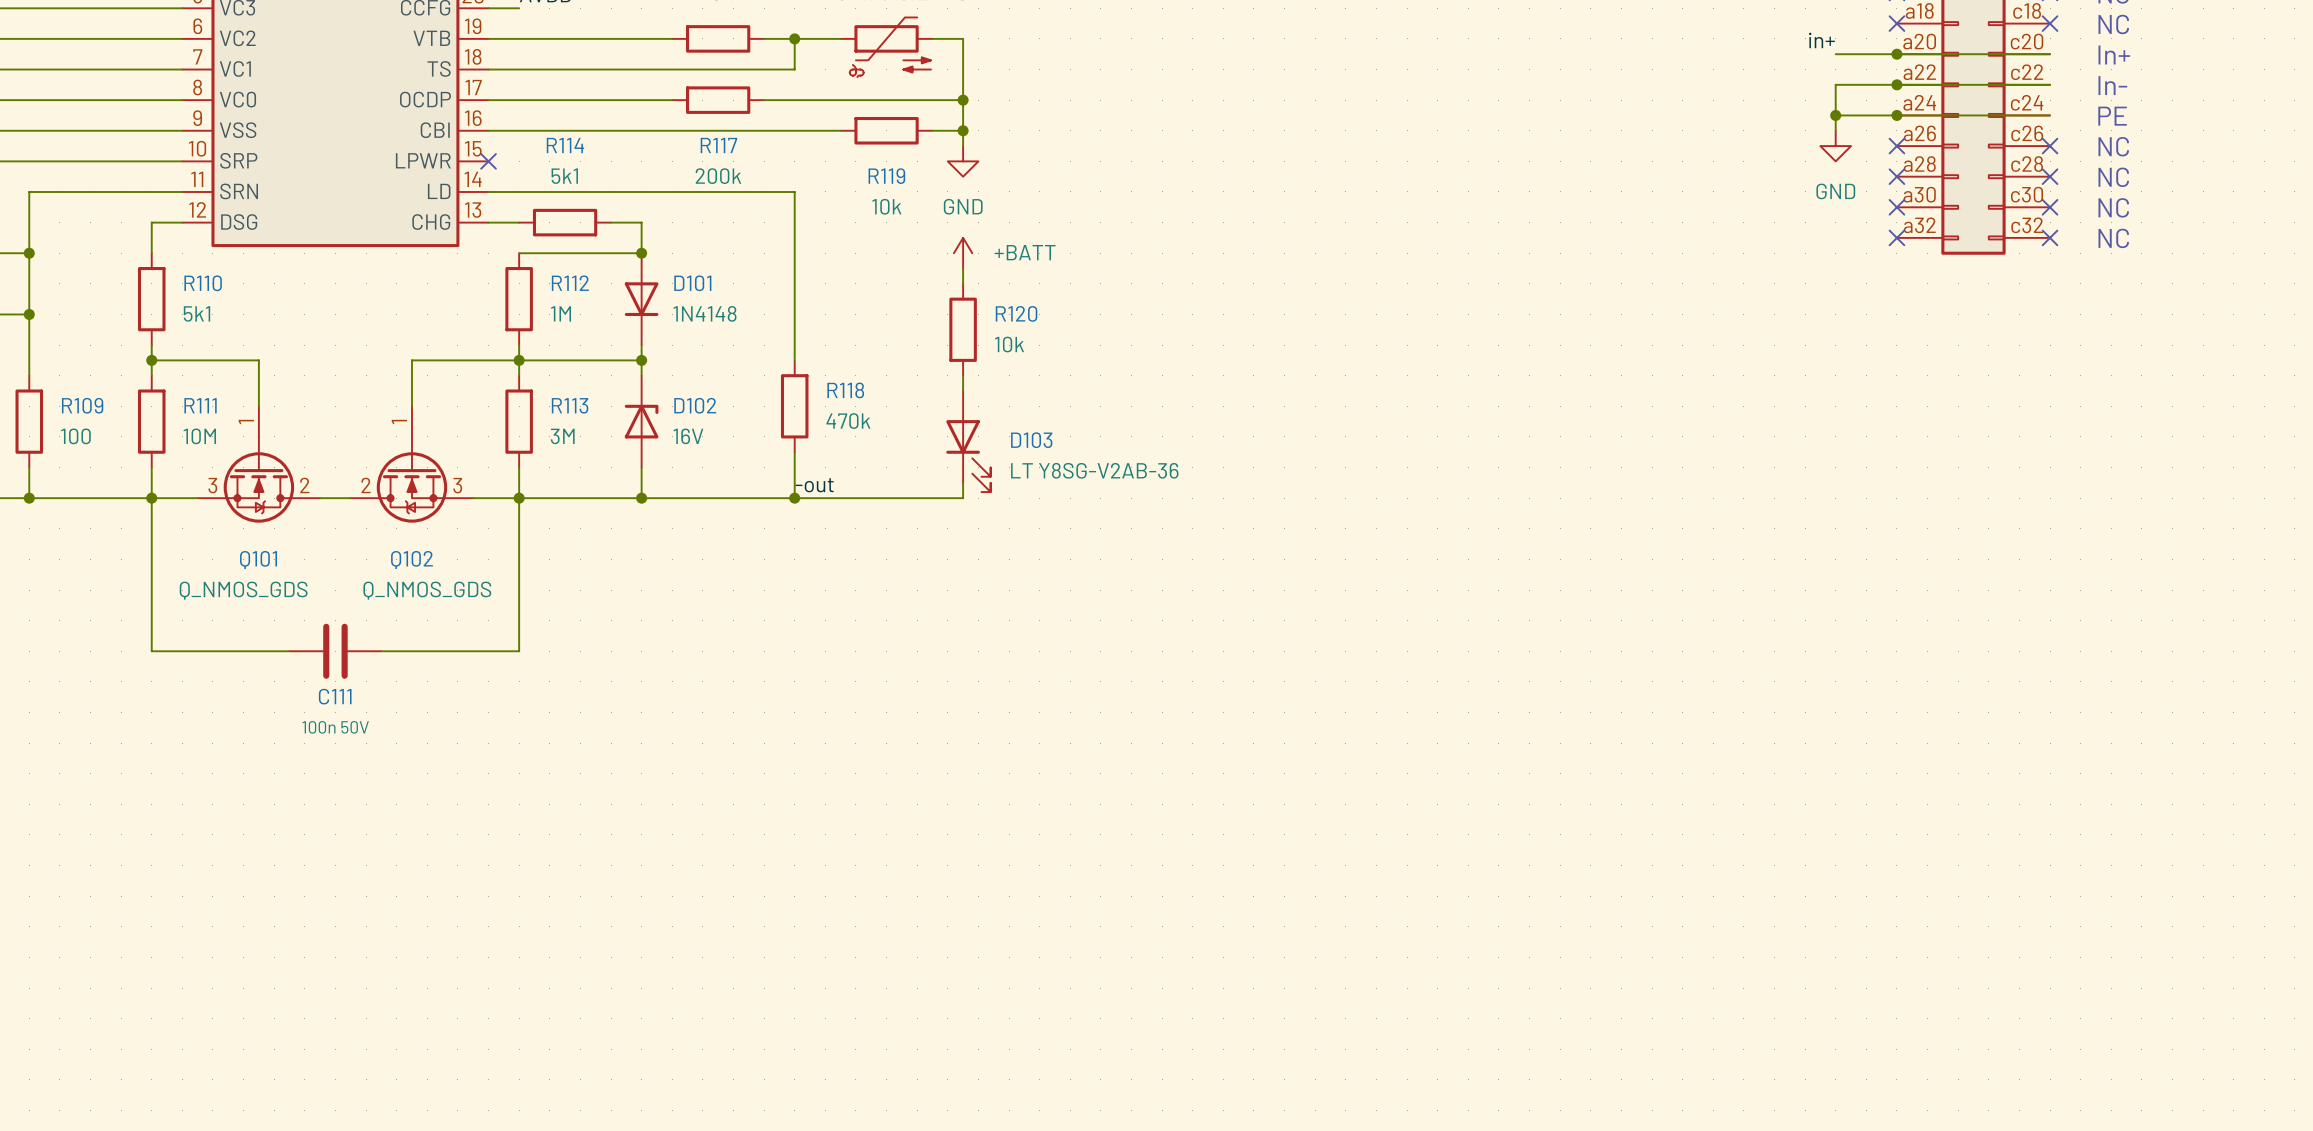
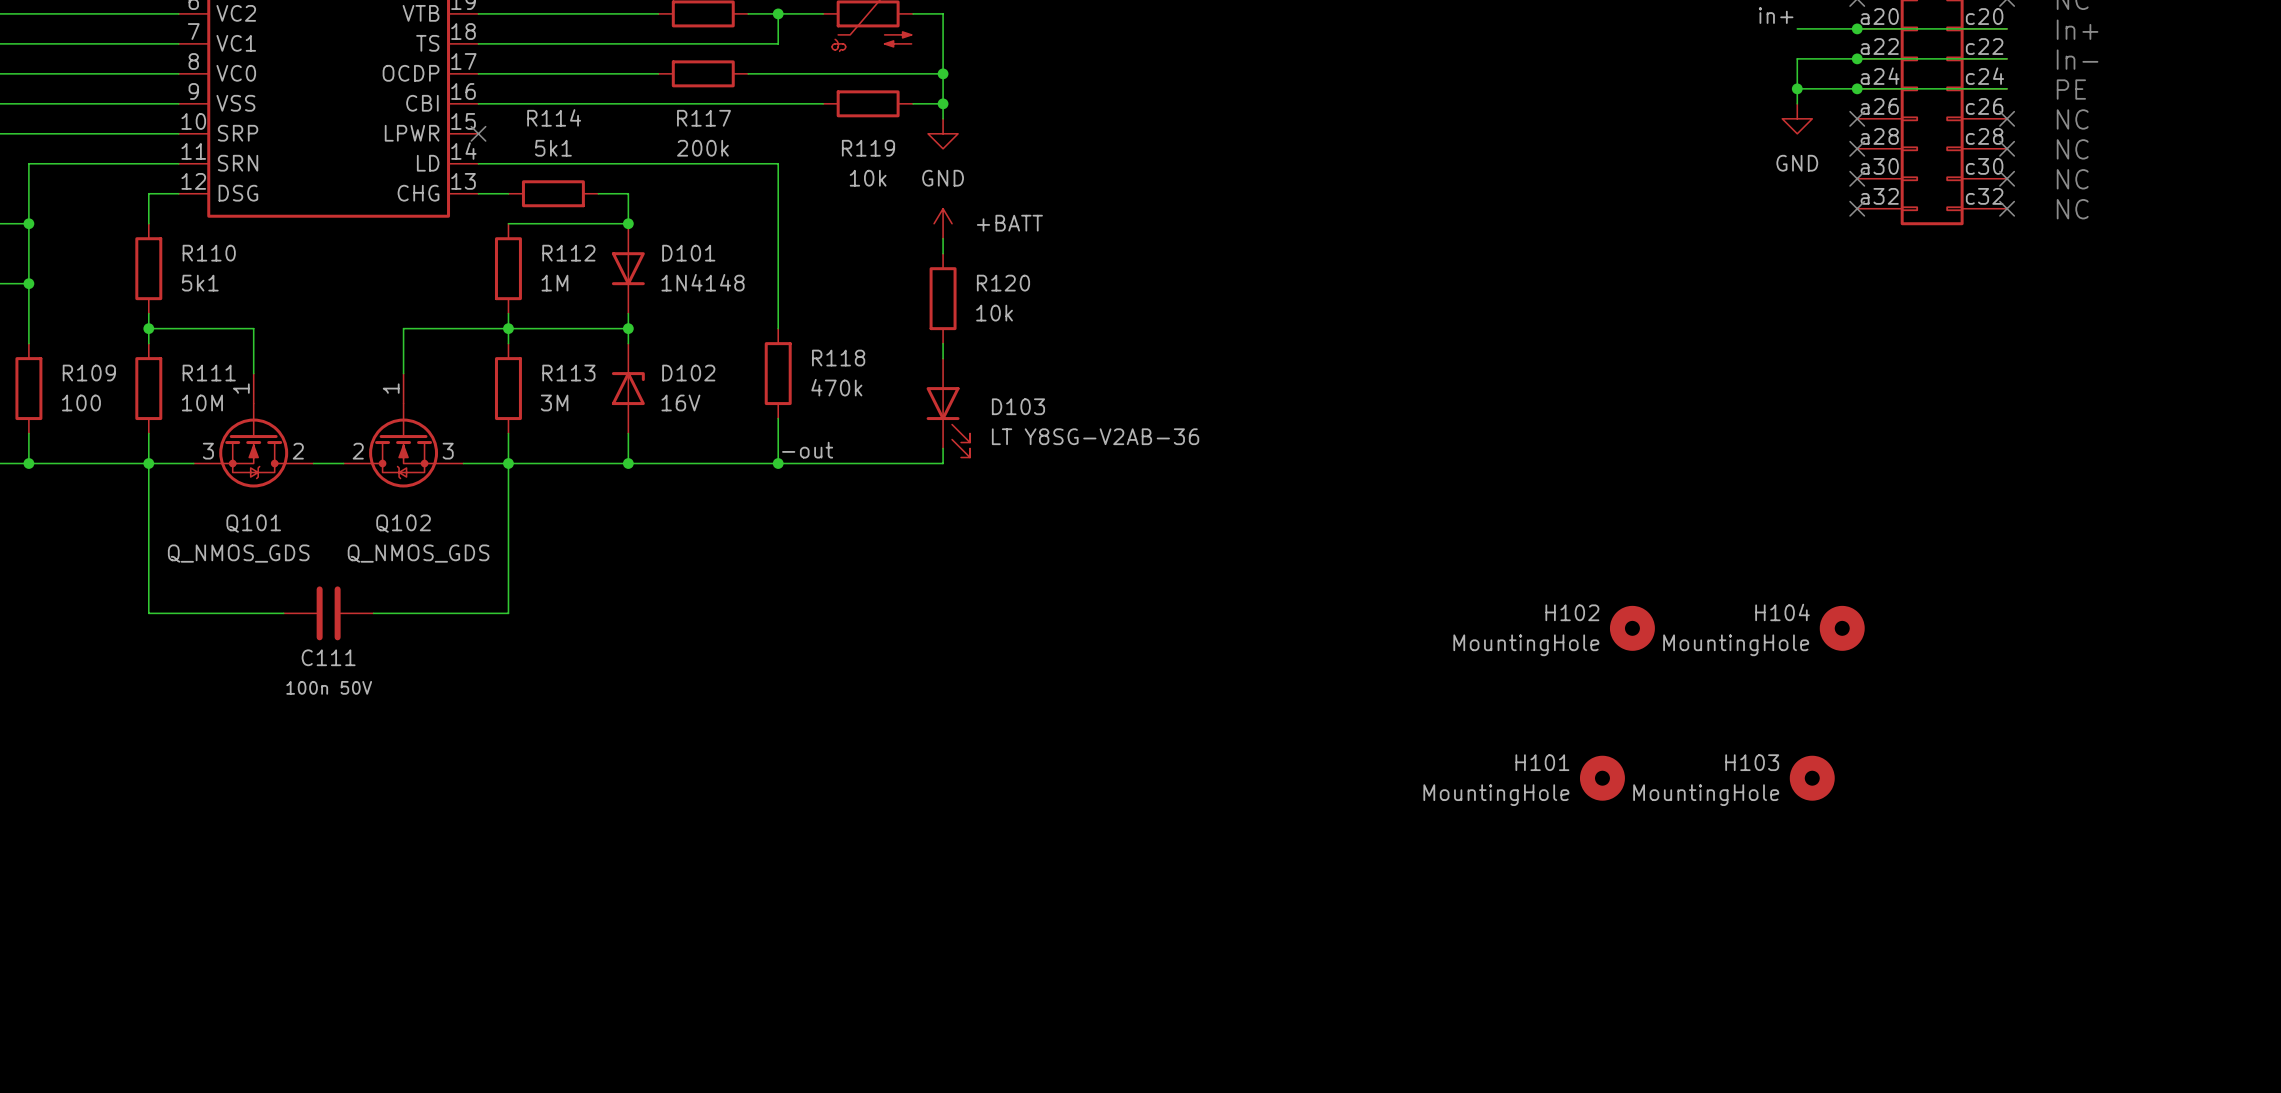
H102: none -> MountingHole (1632, 628)
H104: none -> MountingHole (1842, 628)
H101: none -> MountingHole (1602, 778)
H103: none -> MountingHole (1812, 778)

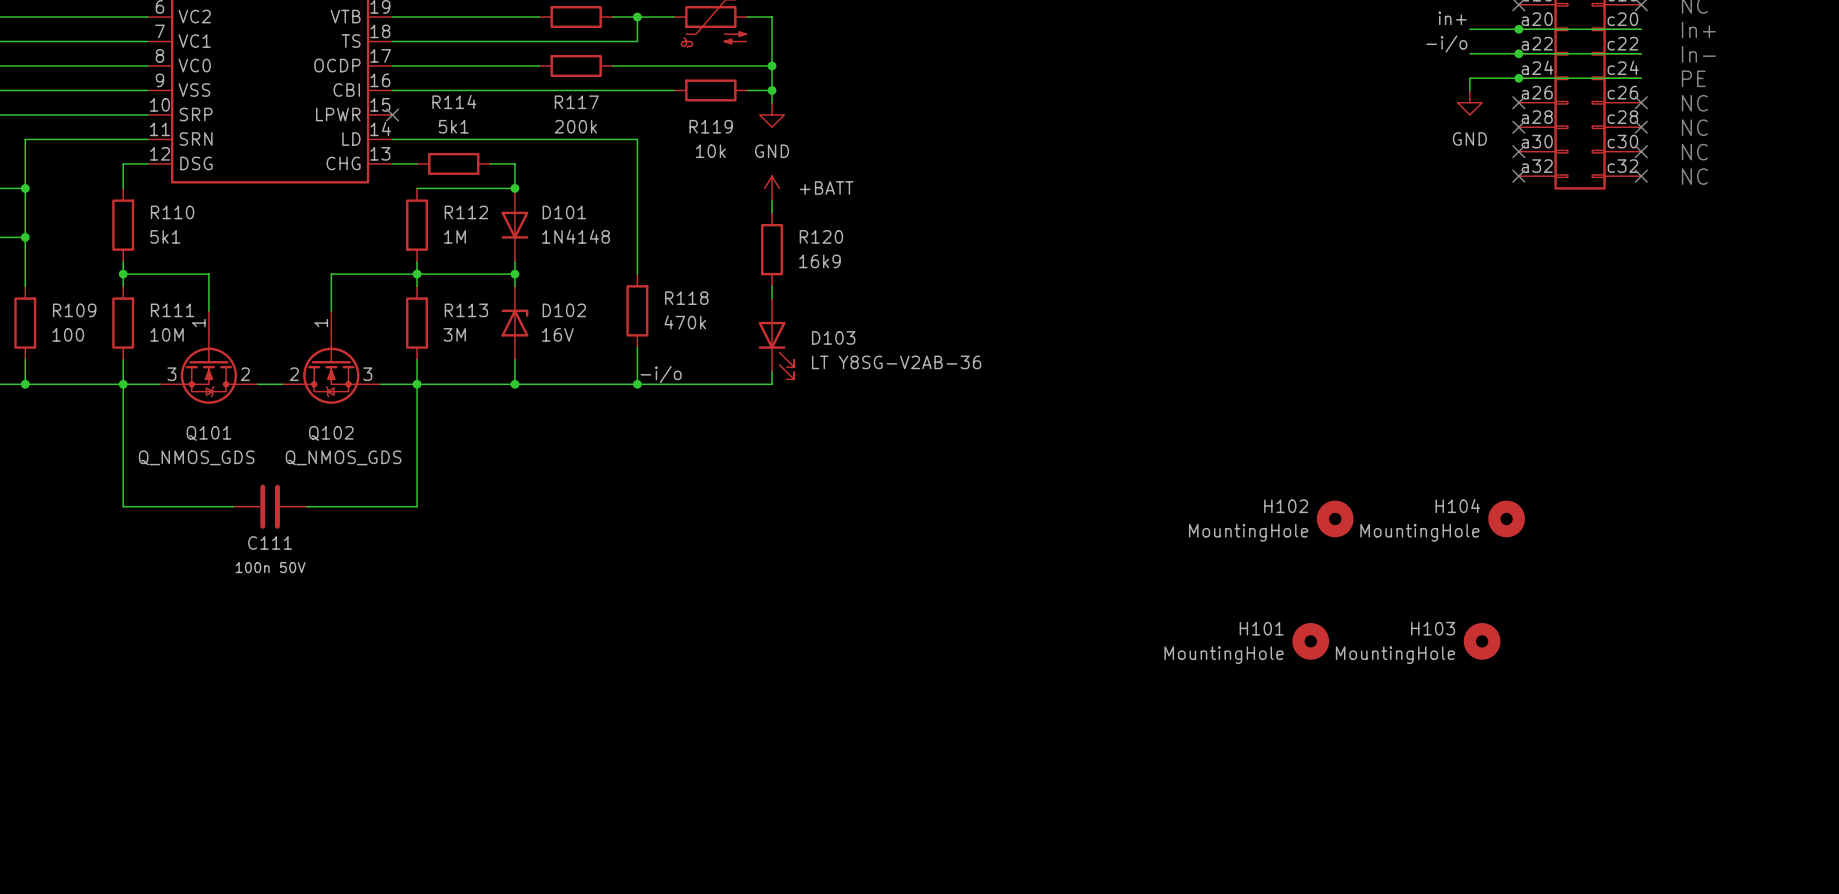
label: none -> -i/o (1446, 43)
wire: (1797, 58) (1797, 88) -> none
junction: (1797, 88) -> none
R120 value: 10k (994, 313) -> 16k9 (819, 261)
label: -out (807, 450) -> -i/o (661, 374)

